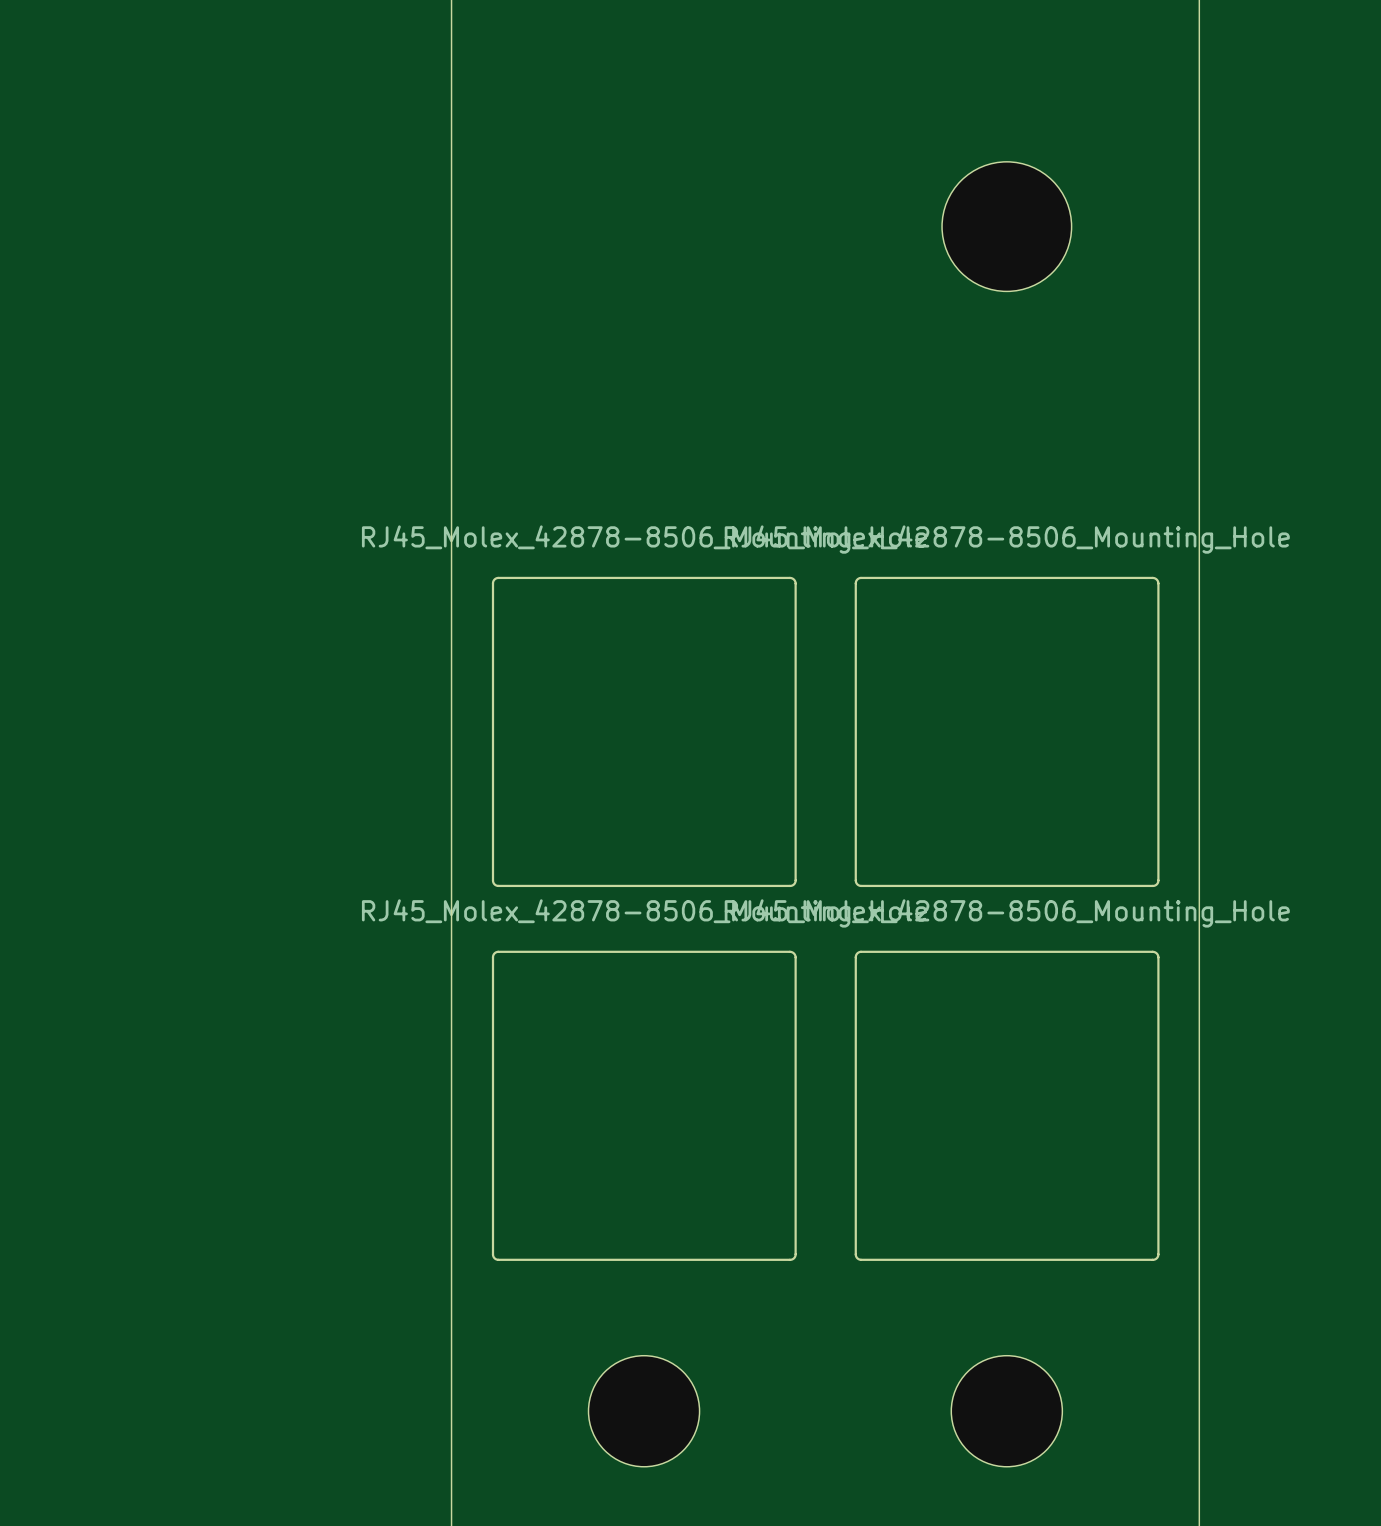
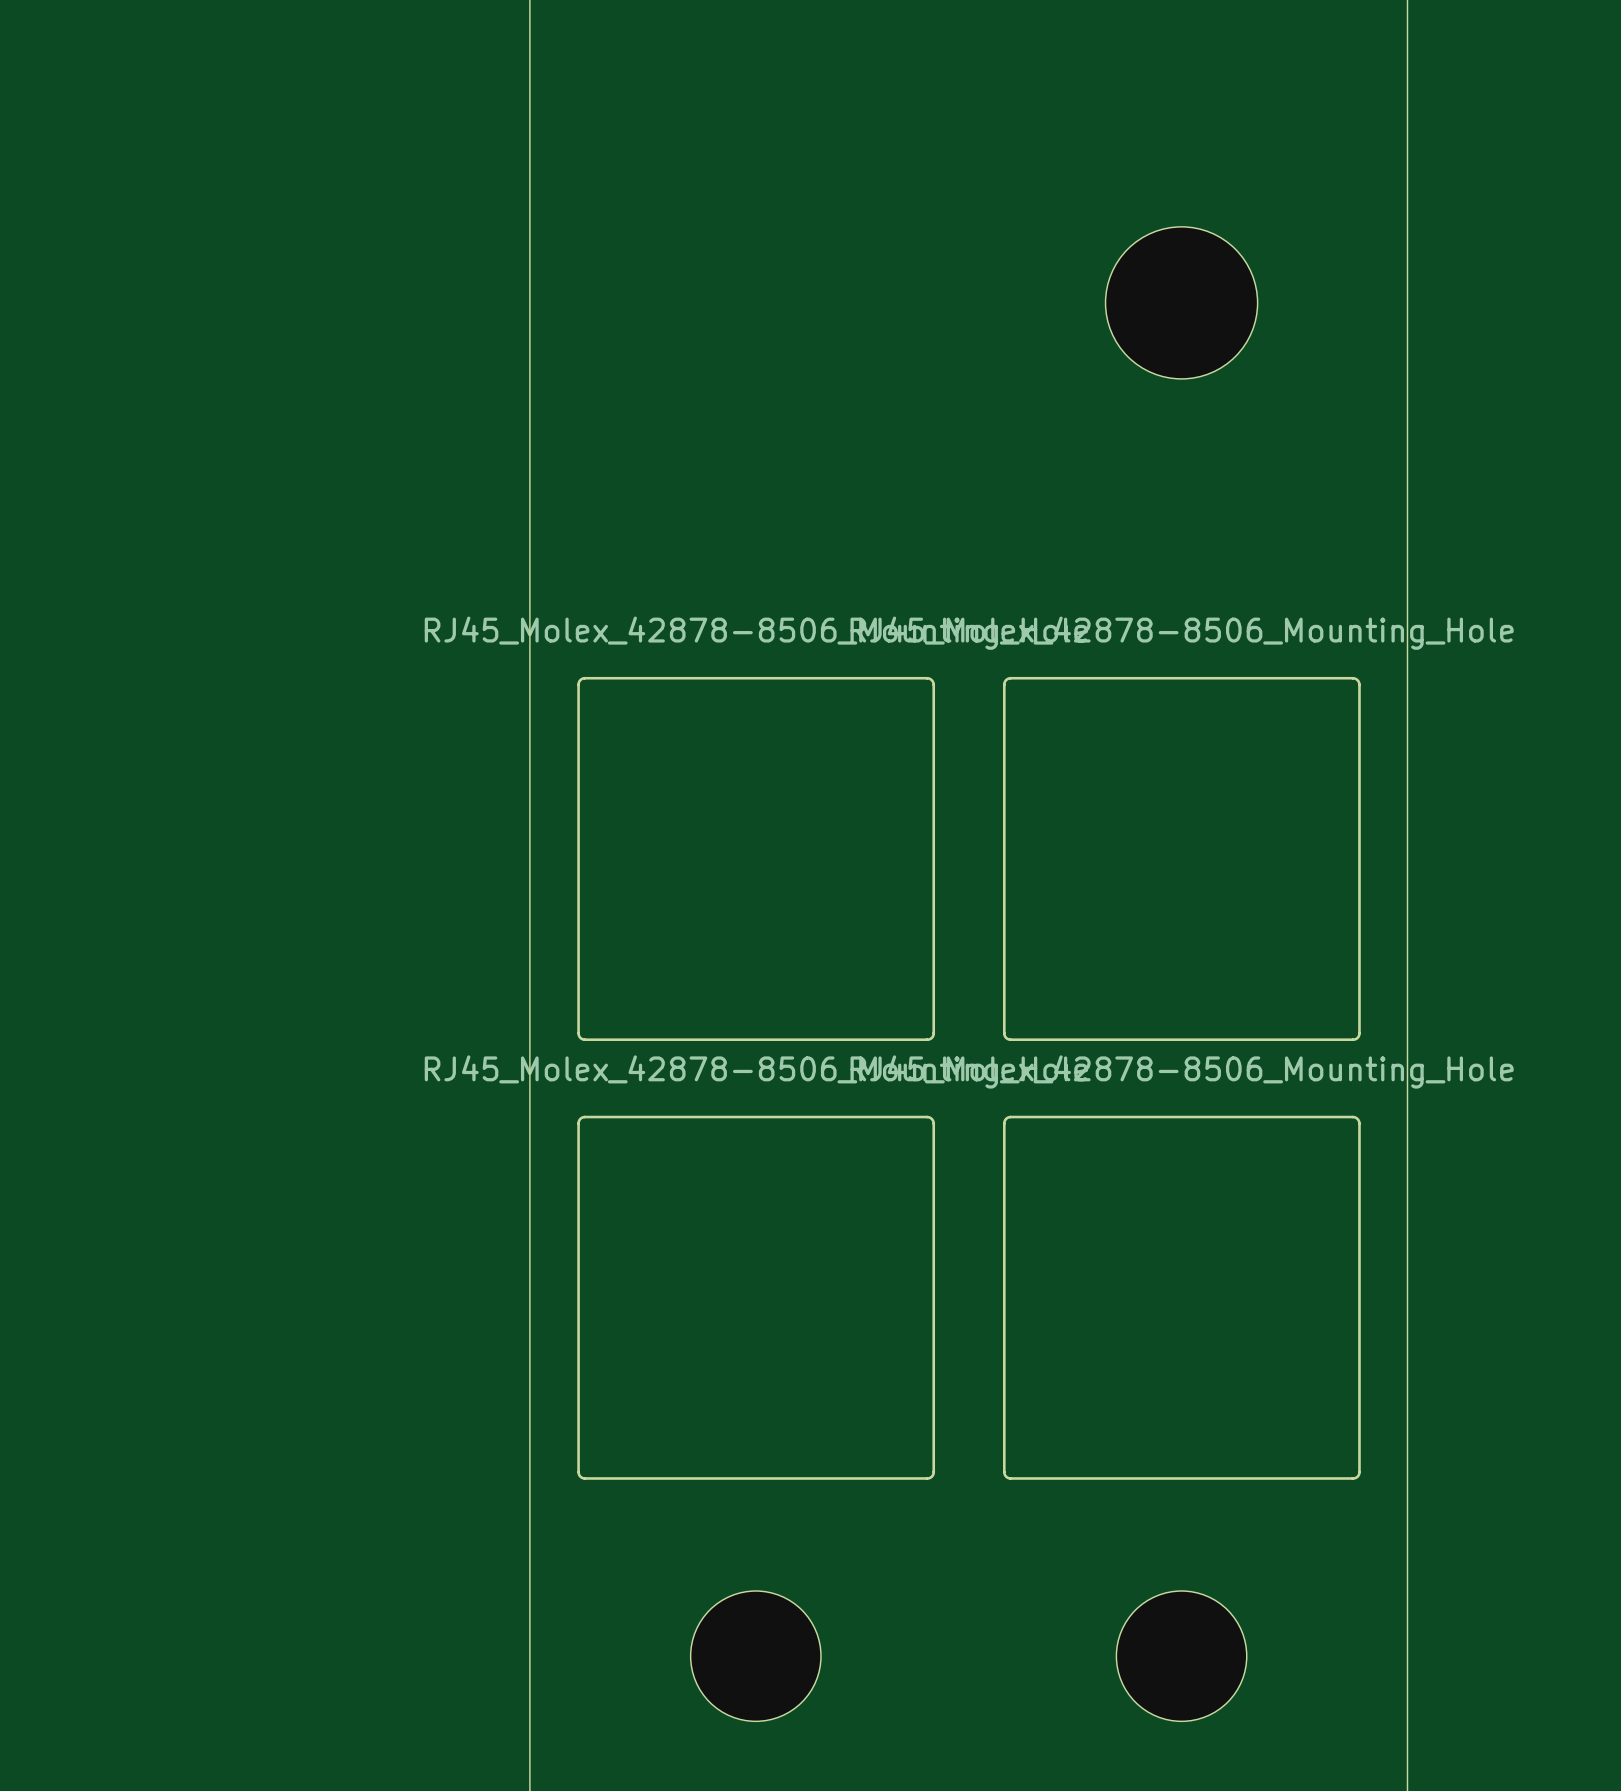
part position: (1006, 226) -> (1181, 302)

